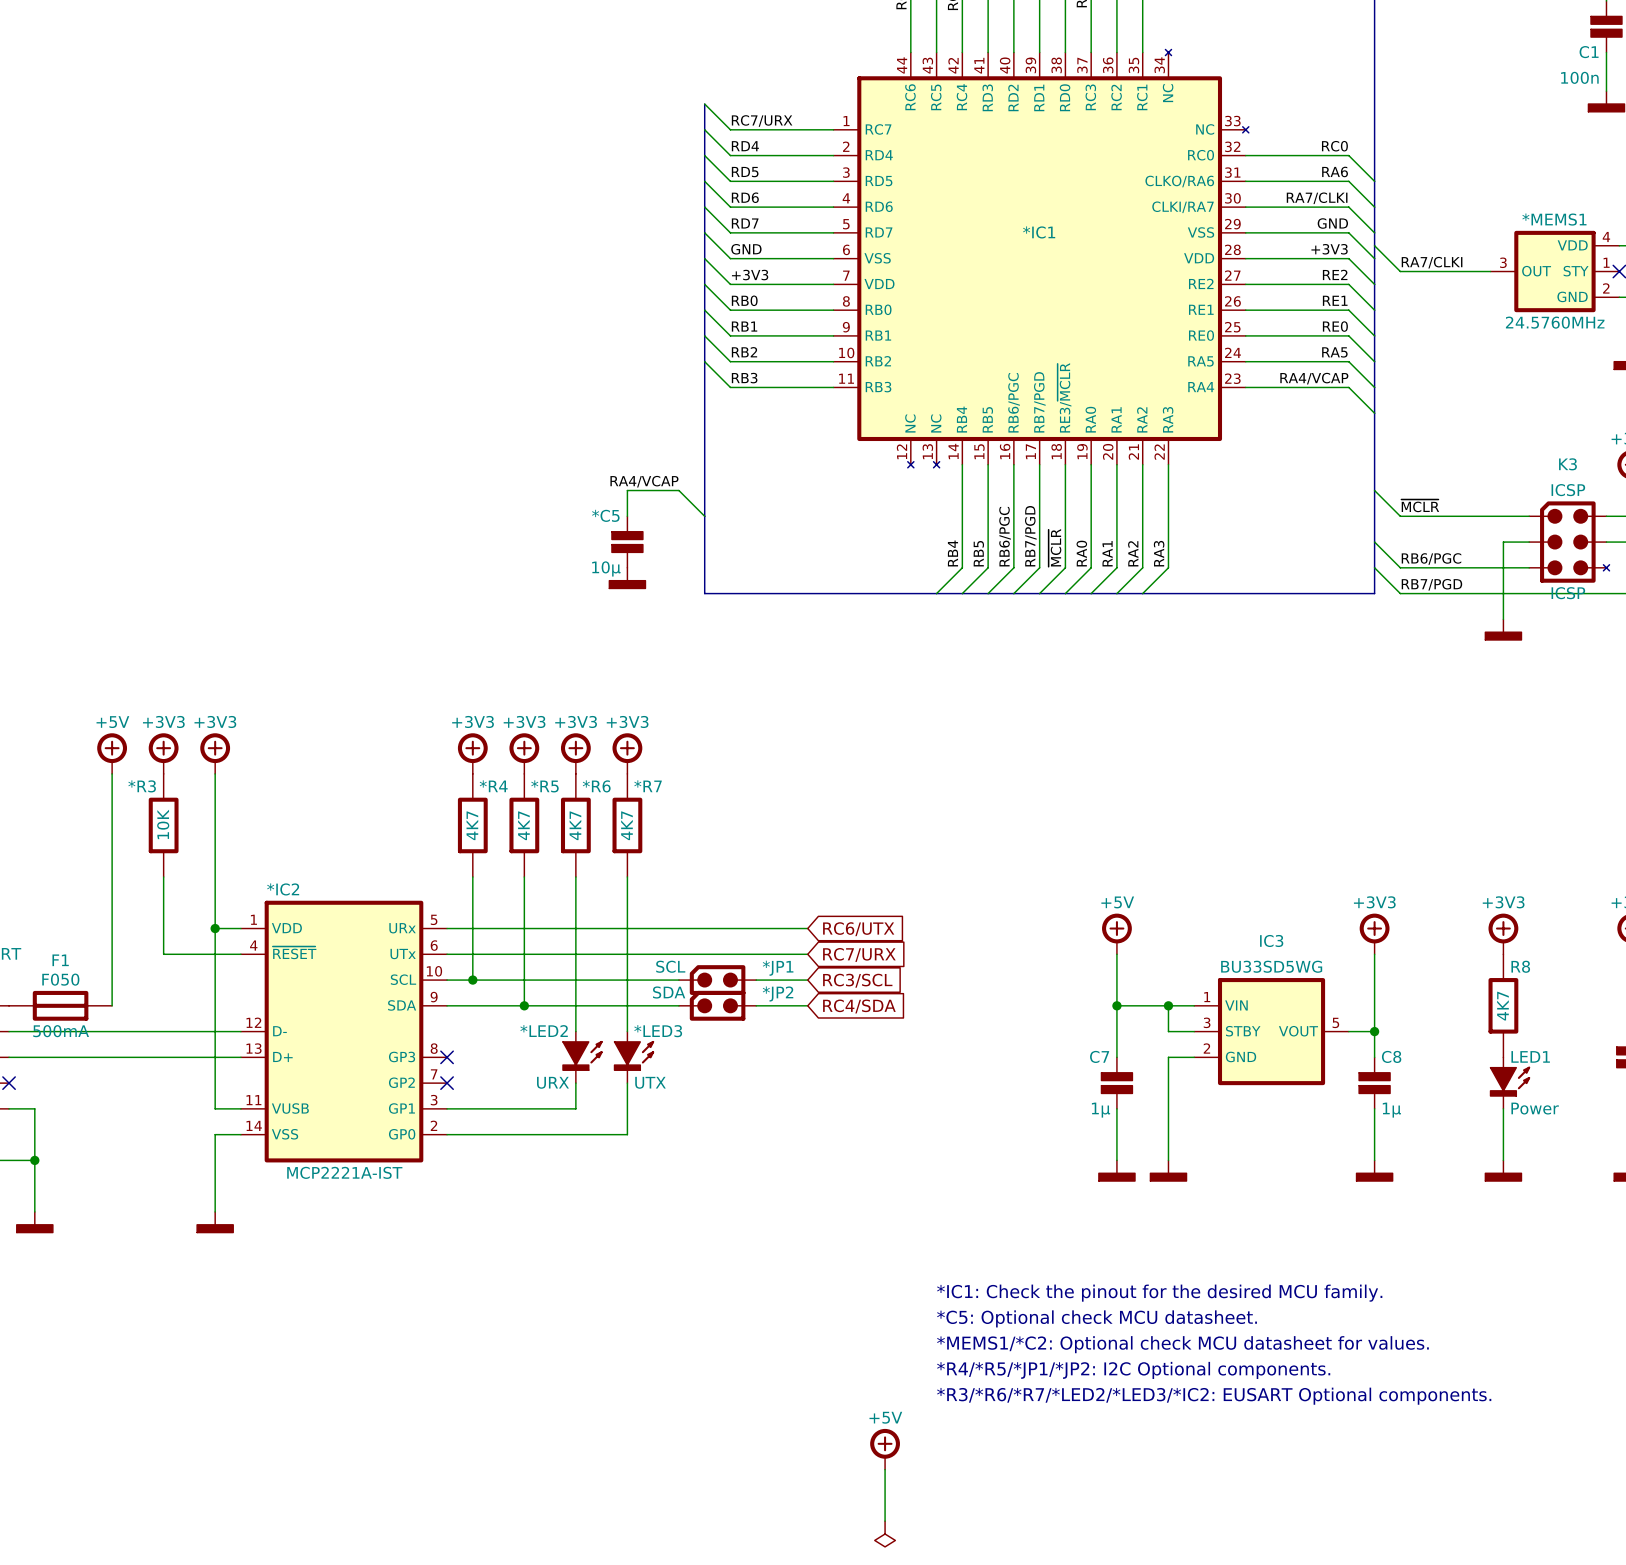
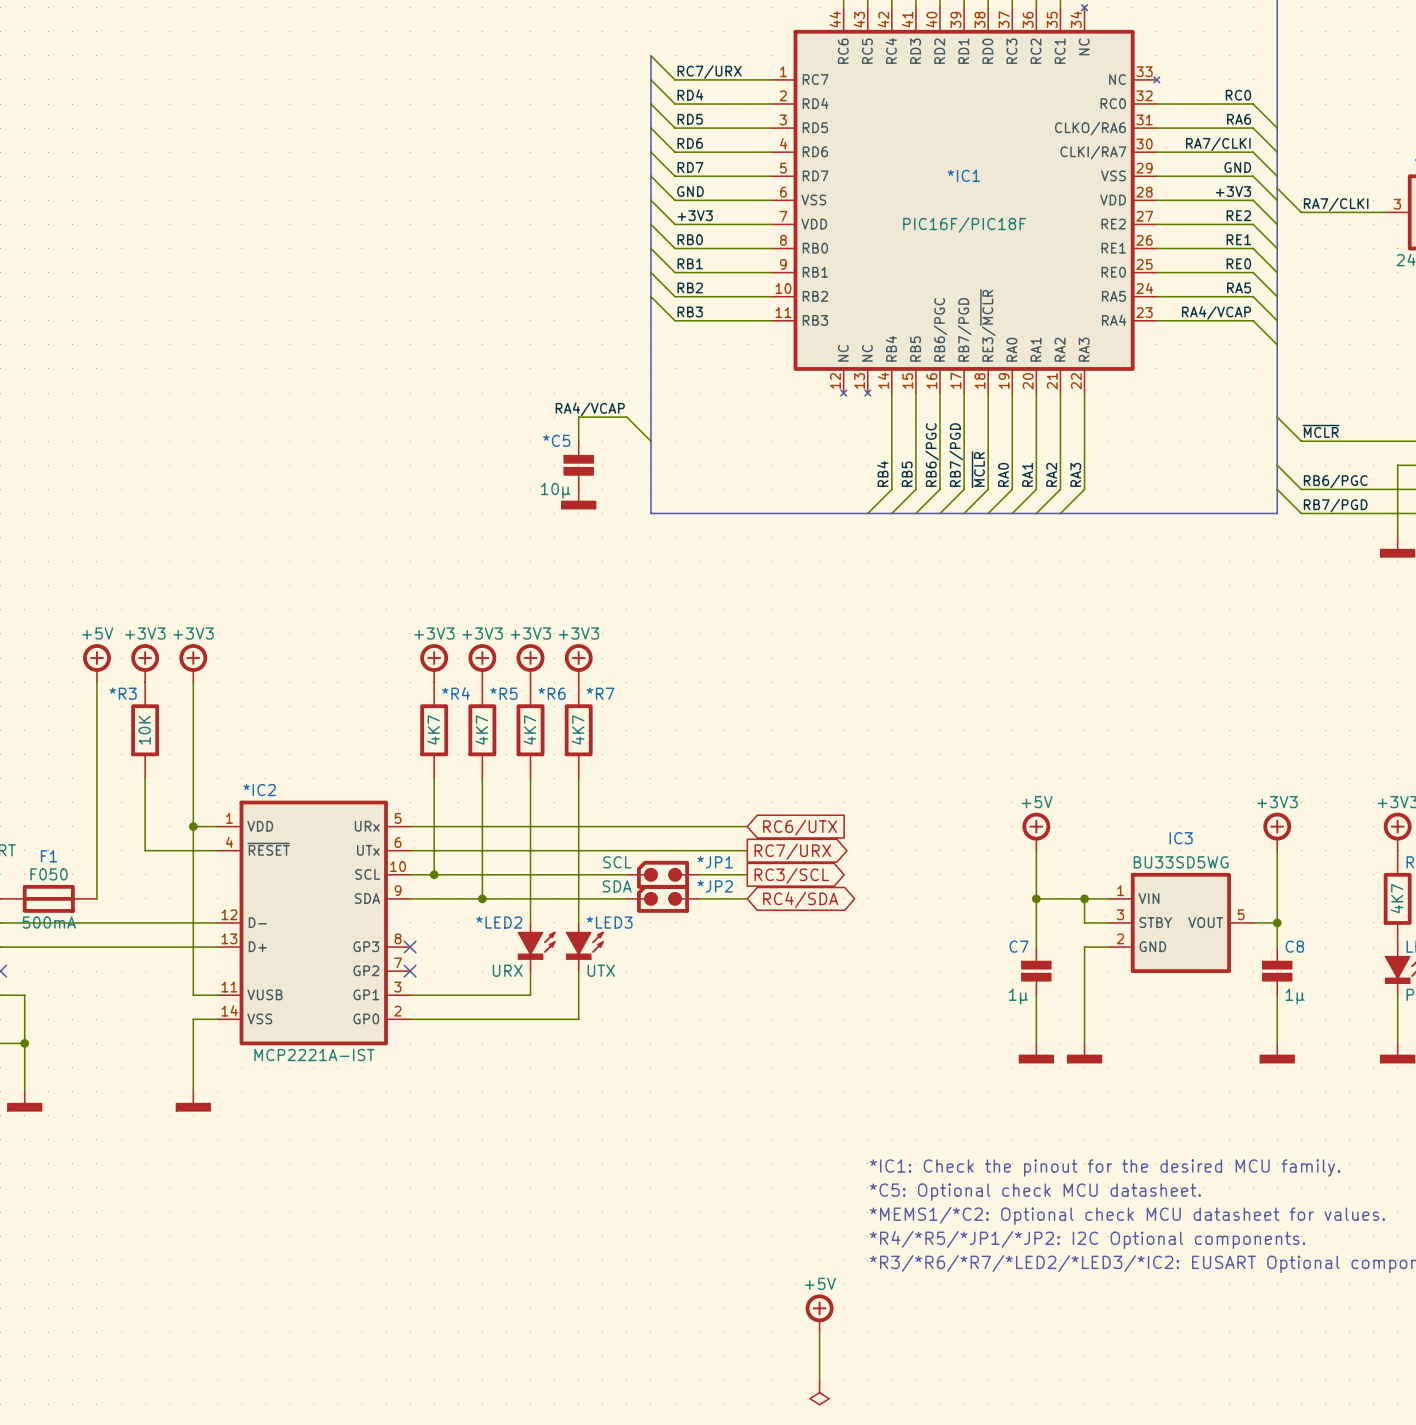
*IC1 value: none -> PIC16F/PIC18F (964, 225)
global label shape: input (859, 954) -> output (792, 851)
global label shape: input (857, 980) -> output (791, 875)
global label shape: input (859, 1006) -> bidirectional (800, 899)

